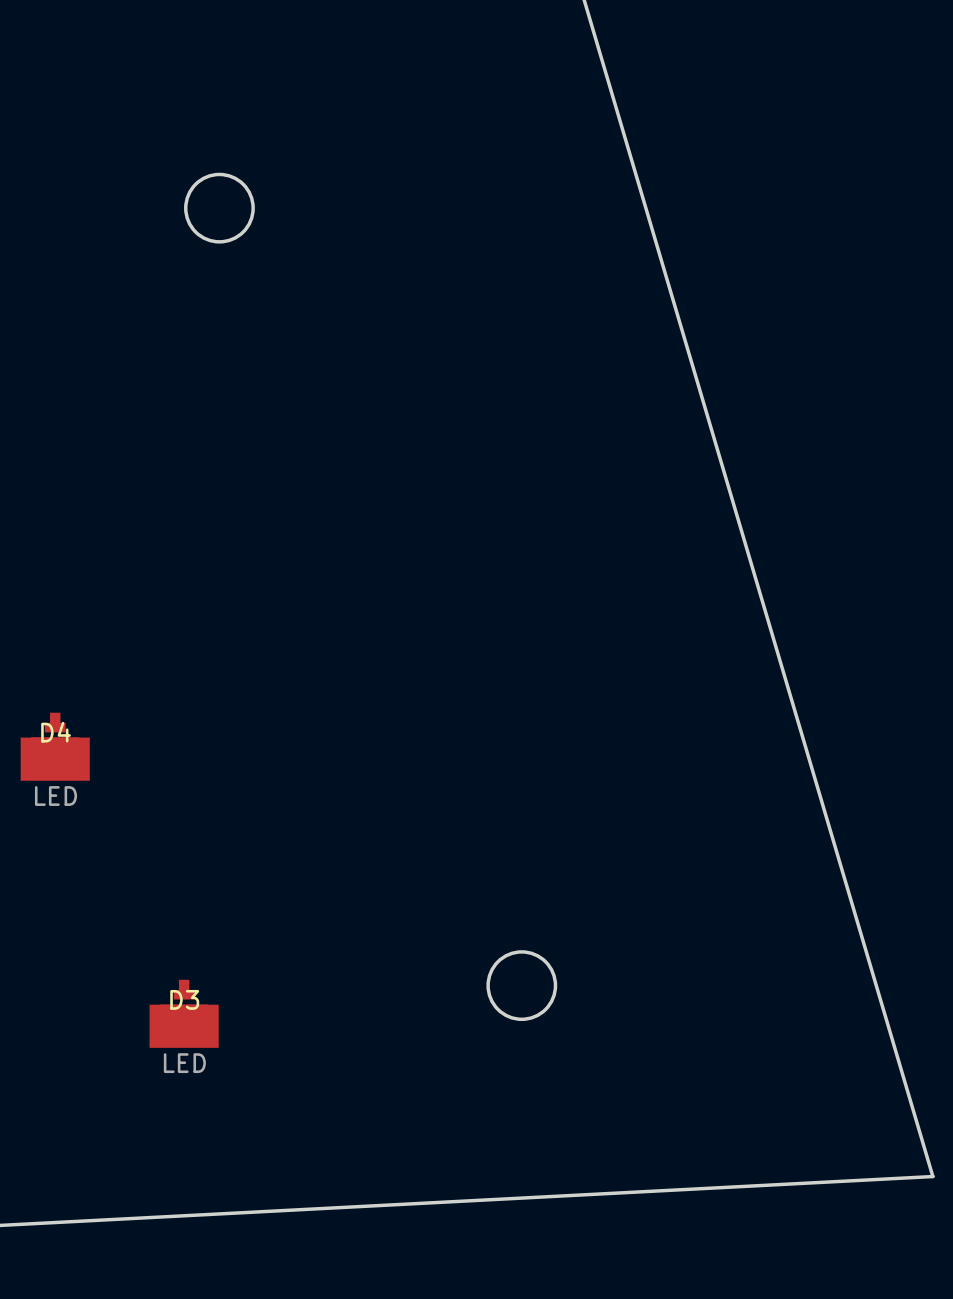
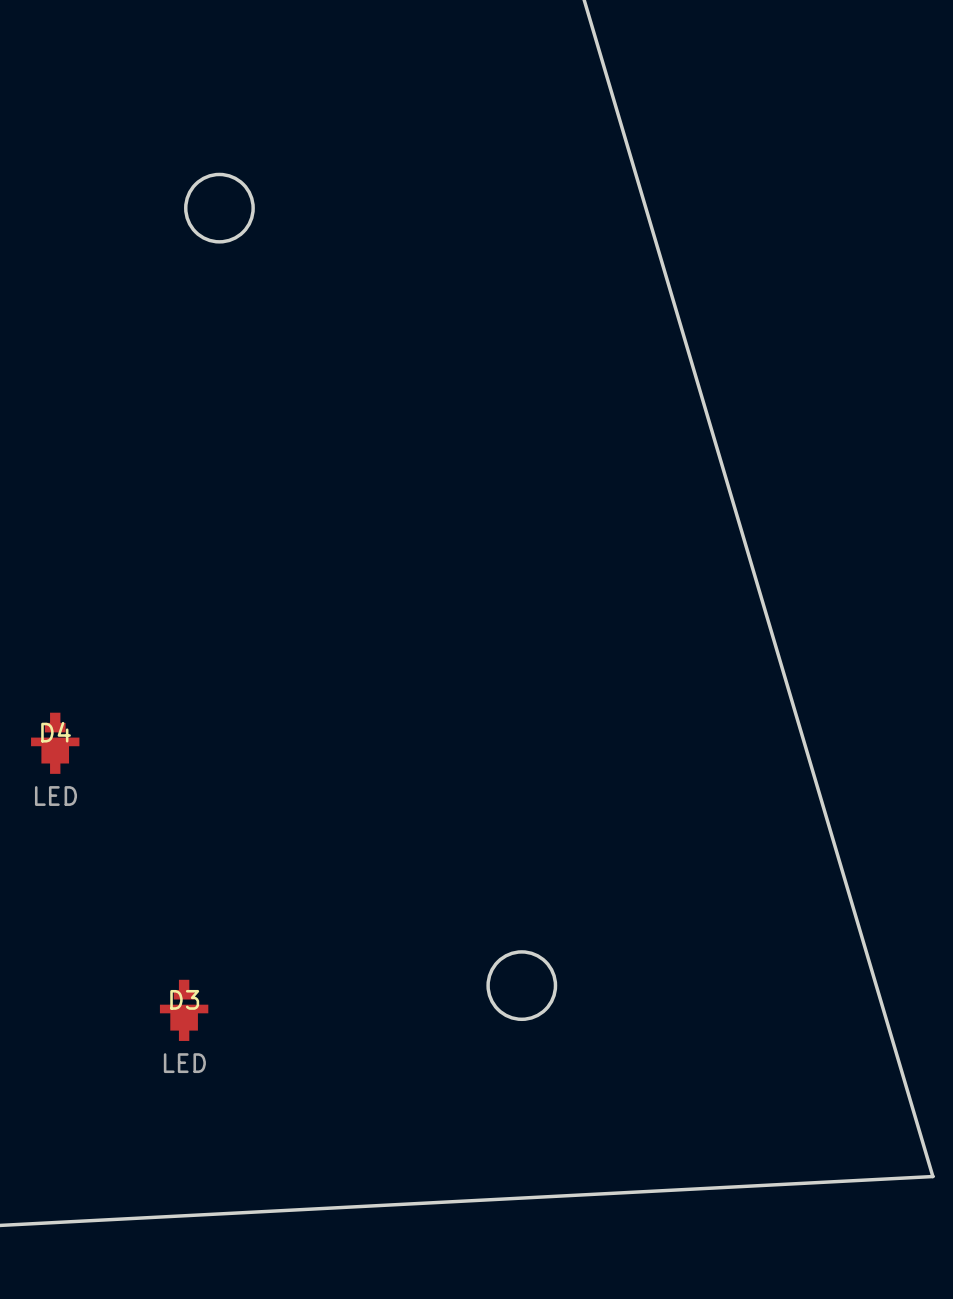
D4 footprint: [20, 712, 90, 781] -> [31, 712, 80, 774]
D3 footprint: [149, 979, 219, 1048] -> [159, 979, 209, 1041]

